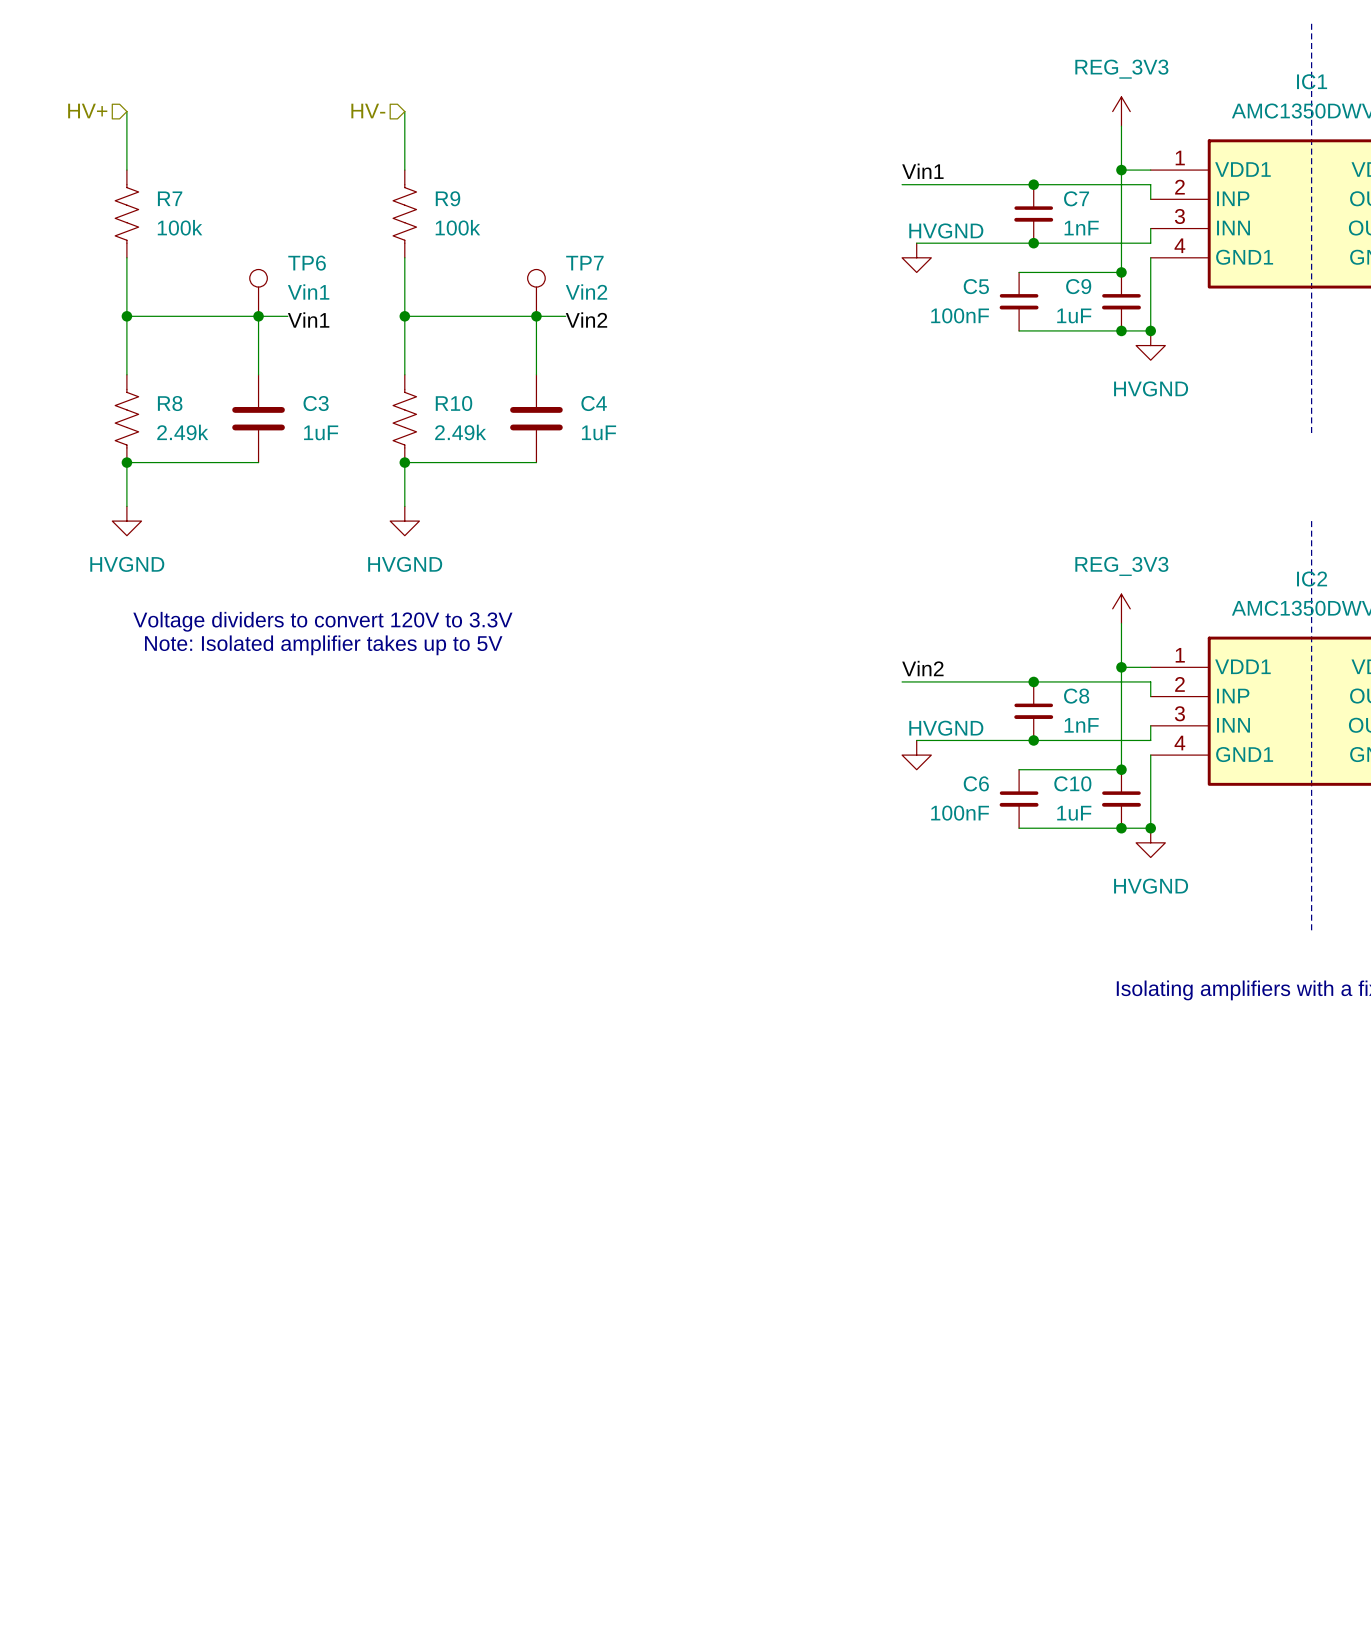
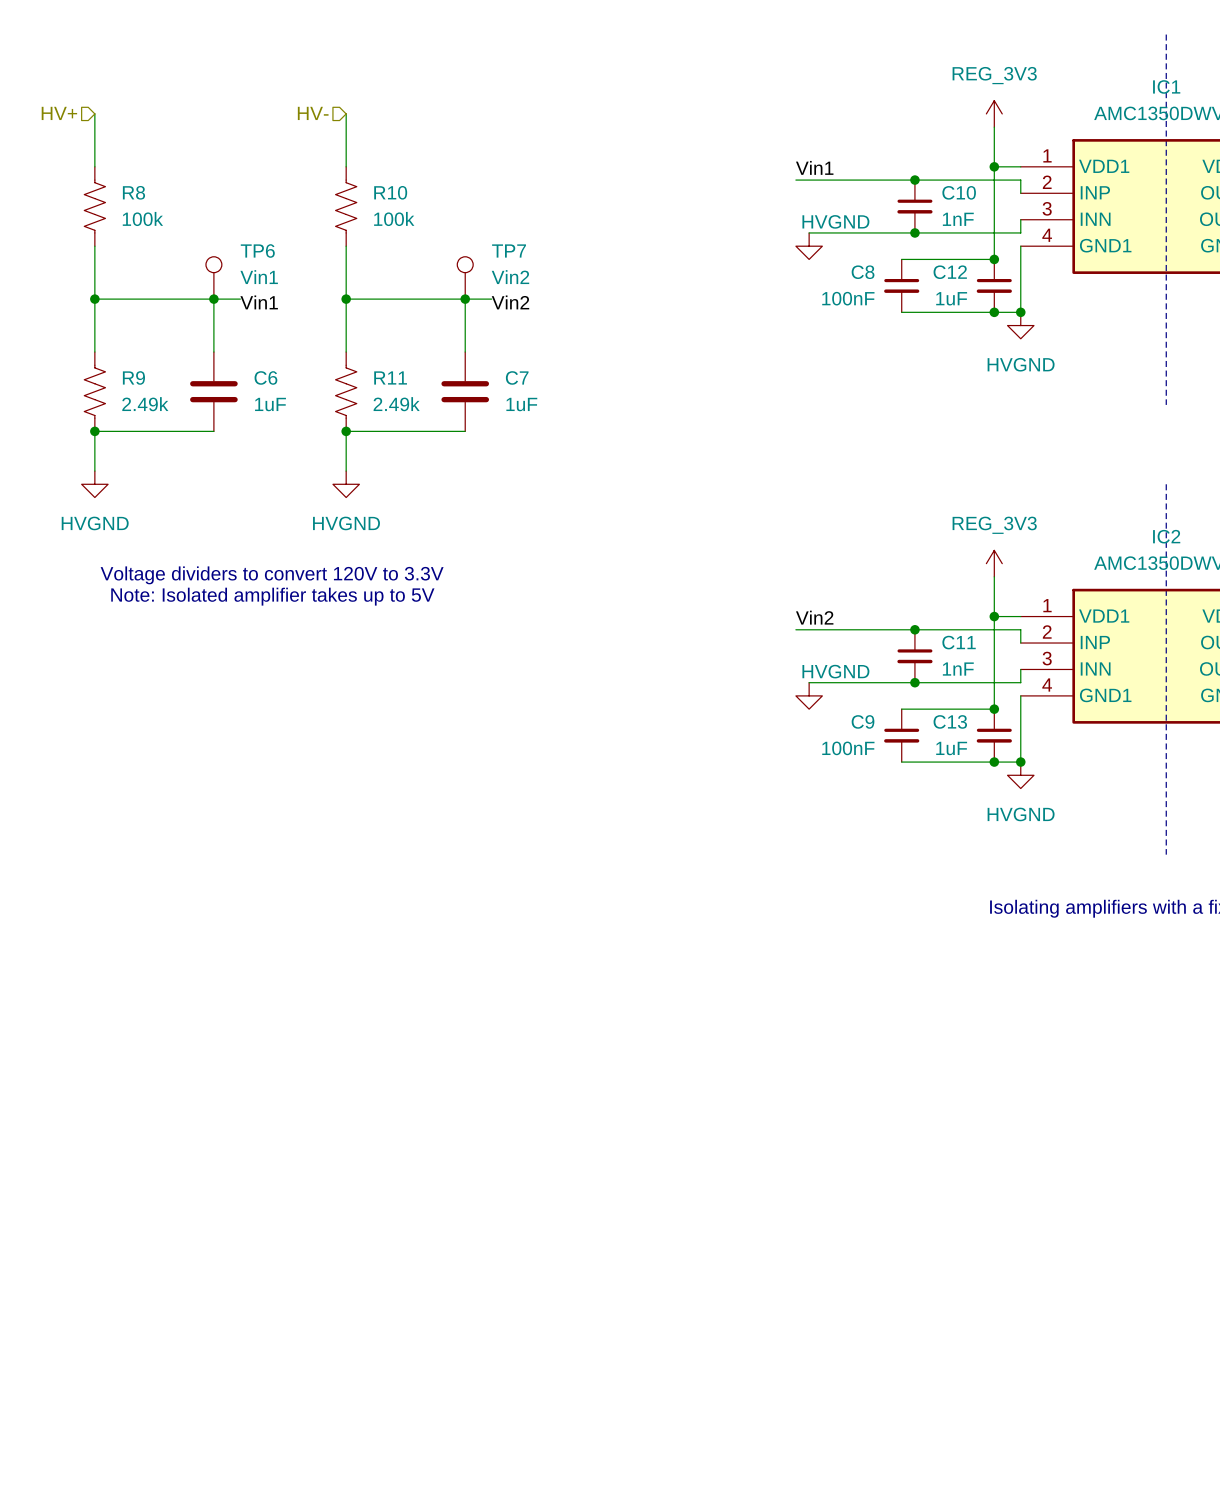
R7 name: R7 (170, 198) -> R8 (133, 192)
R9 name: R9 (448, 198) -> R10 (390, 192)
C7 name: C7 (1076, 198) -> C10 (959, 192)
C5 name: C5 (976, 286) -> C8 (863, 272)
C9 name: C9 (1078, 286) -> C12 (950, 272)
R8 name: R8 (170, 403) -> R9 (133, 377)
C3 name: C3 (316, 403) -> C6 (265, 377)
R10 name: R10 (454, 403) -> R11 (390, 377)
C4 name: C4 (594, 403) -> C7 (517, 377)
C8 name: C8 (1076, 696) -> C11 (959, 642)
C6 name: C6 (976, 783) -> C9 (863, 721)
C10 name: C10 (1072, 783) -> C13 (950, 721)

